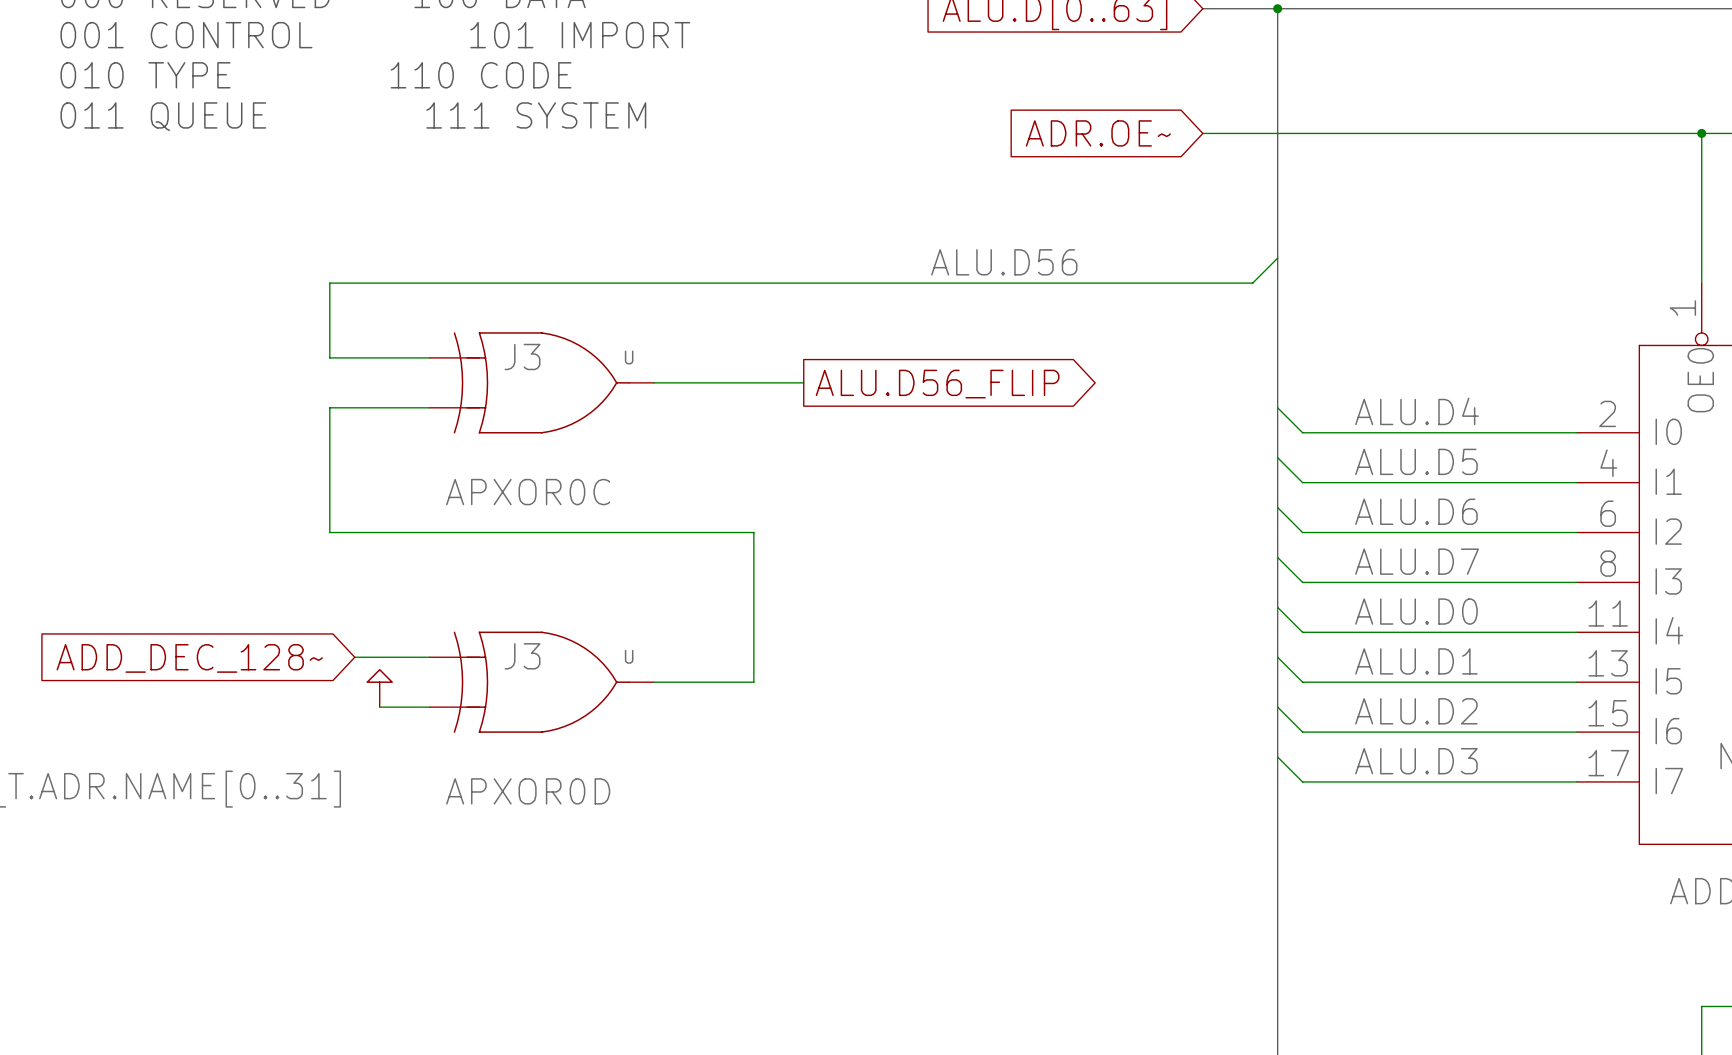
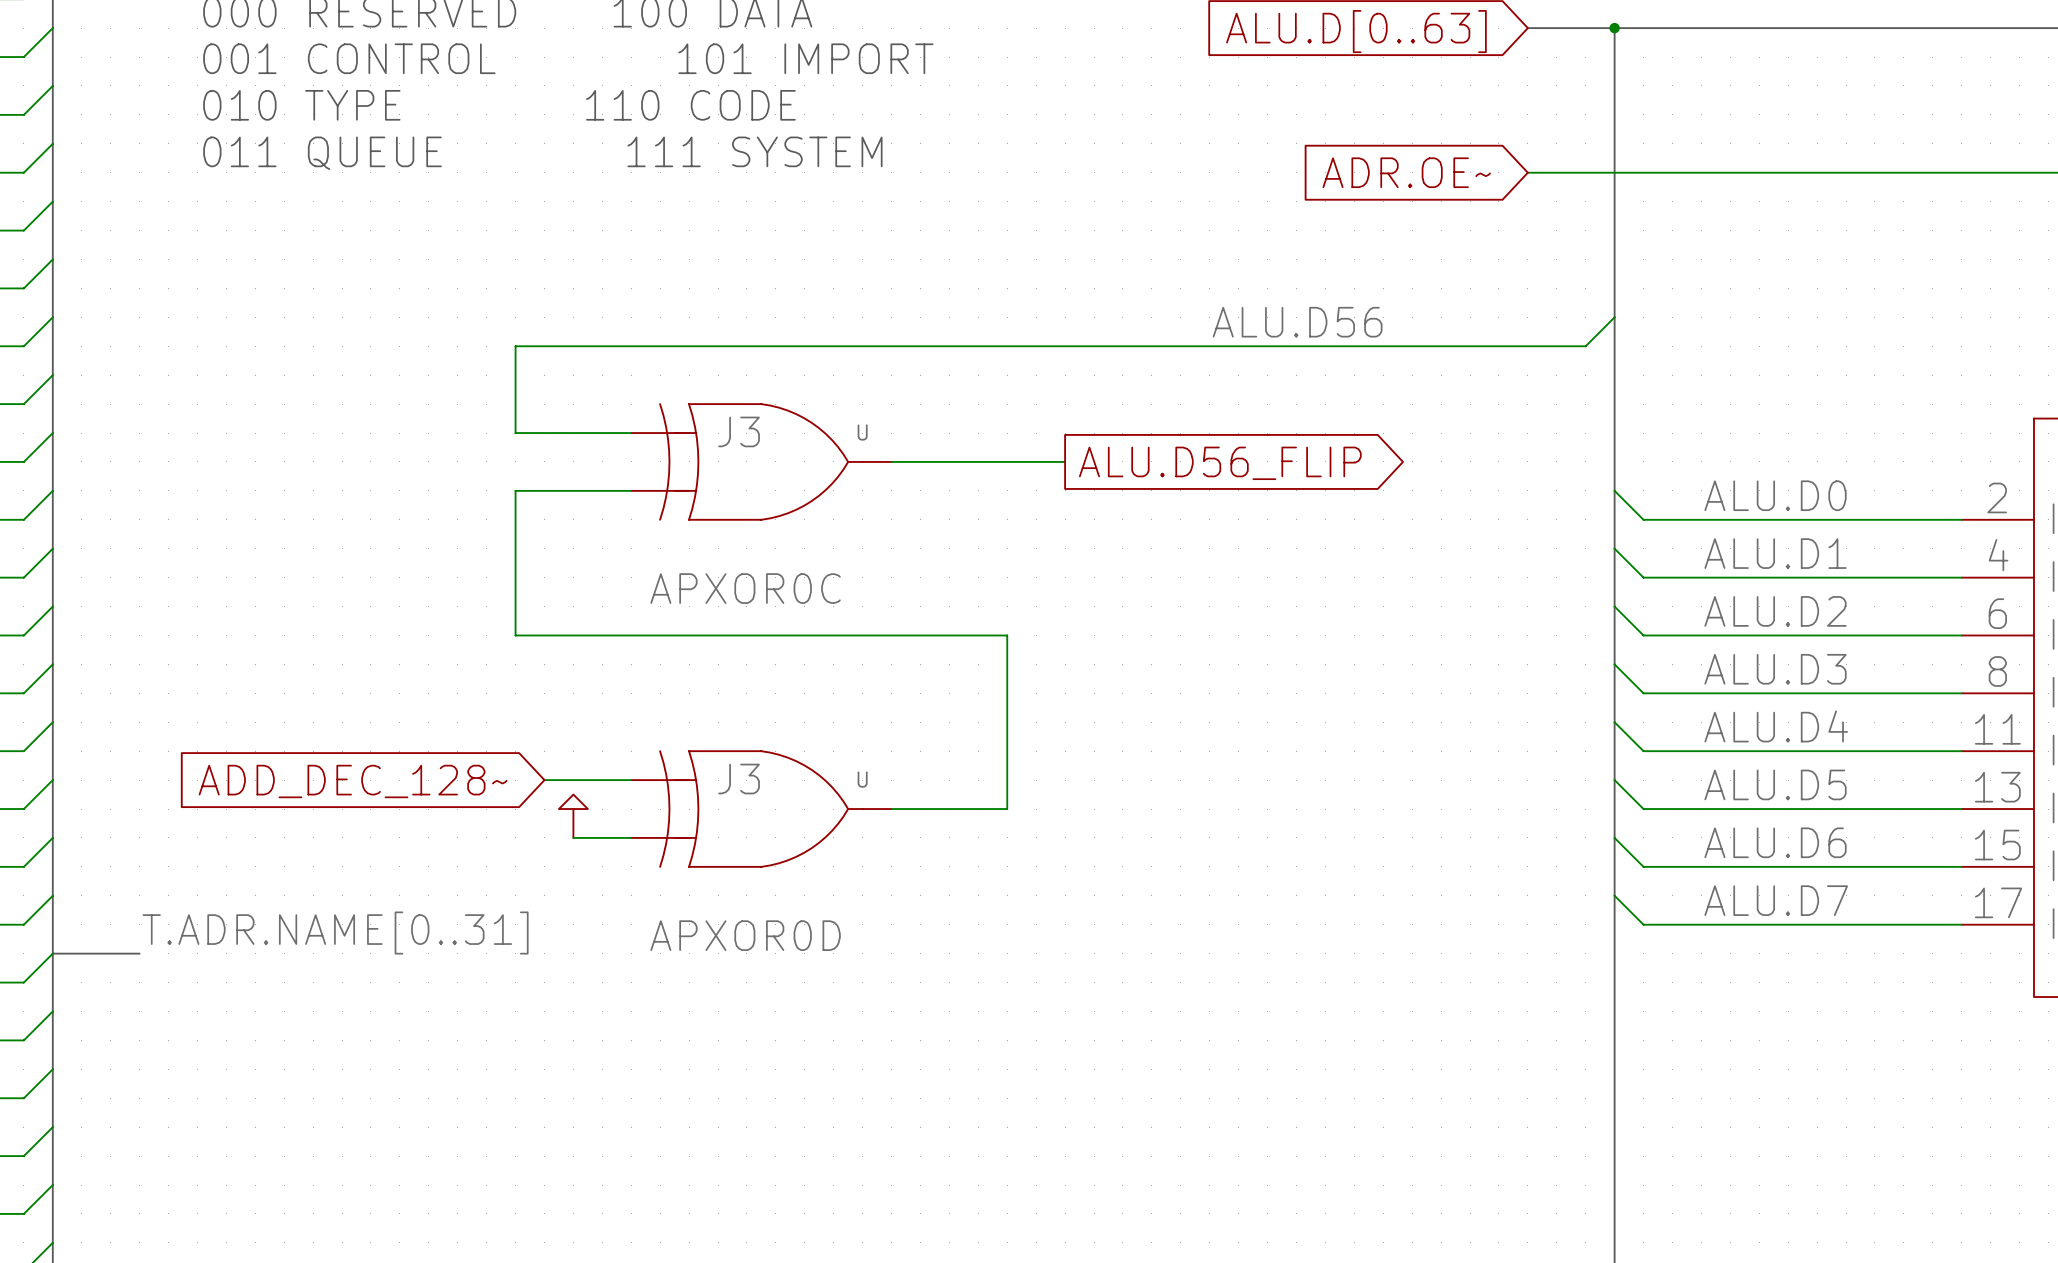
label: ALU.D4 (1417, 411) -> ALU.D0 (1775, 495)
label: ALU.D5 (1416, 461) -> ALU.D1 (1775, 553)
label: ALU.D6 (1416, 511) -> ALU.D2 (1775, 611)
label: ALU.D7 (1417, 561) -> ALU.D3 (1775, 669)
label: ALU.D0 (1416, 611) -> ALU.D4 (1776, 726)
label: ALU.D1 (1416, 661) -> ALU.D5 (1775, 784)
label: ALU.D2 (1416, 711) -> ALU.D6 (1775, 842)
label: ALU.D3 (1416, 761) -> ALU.D7 (1776, 900)

